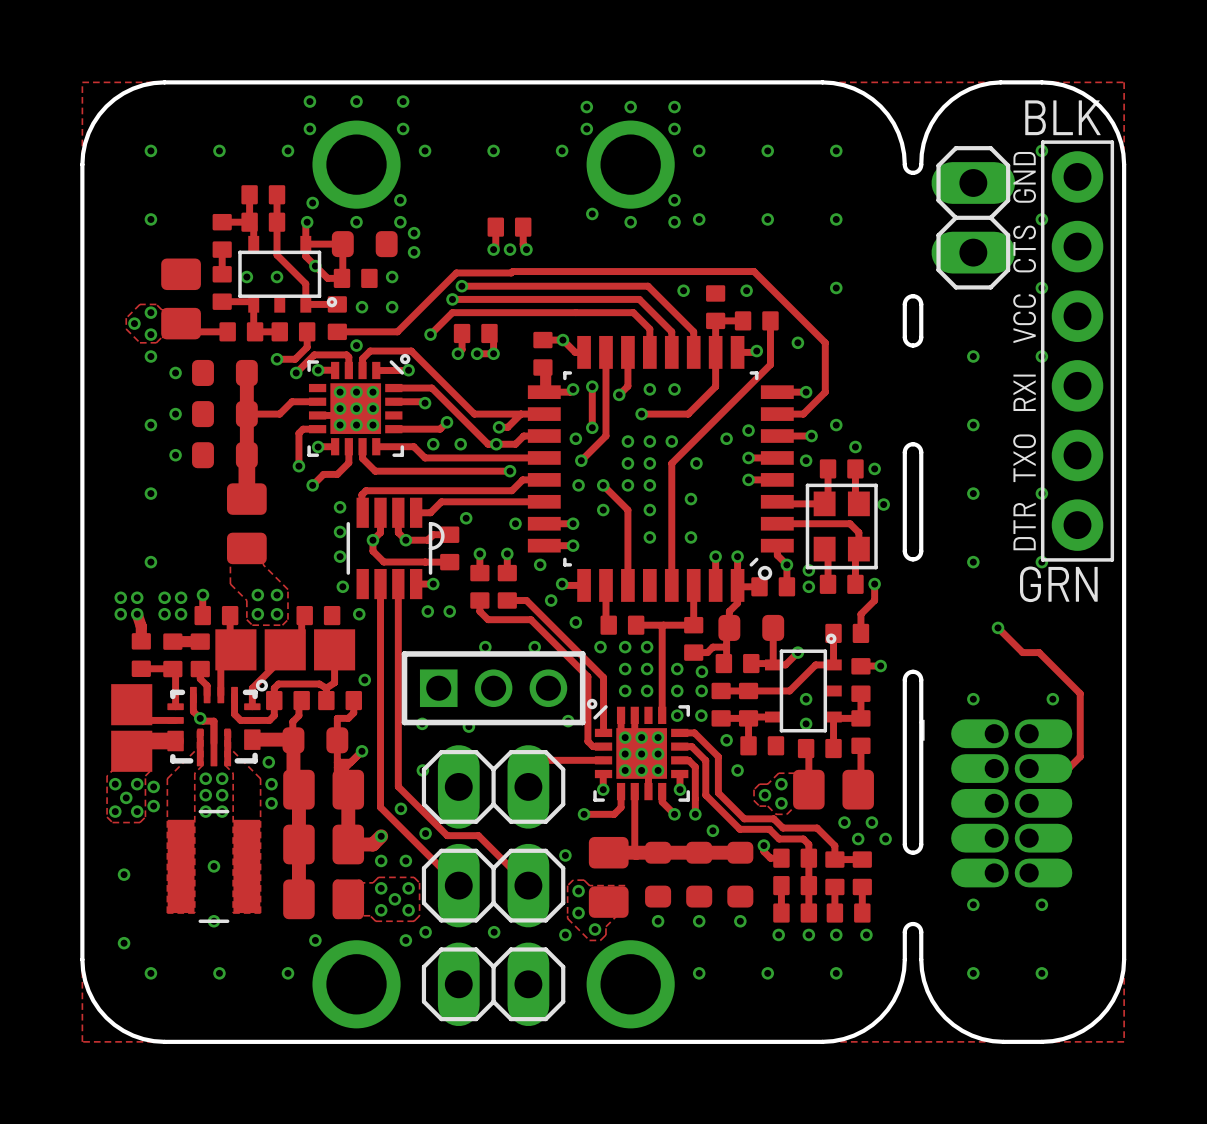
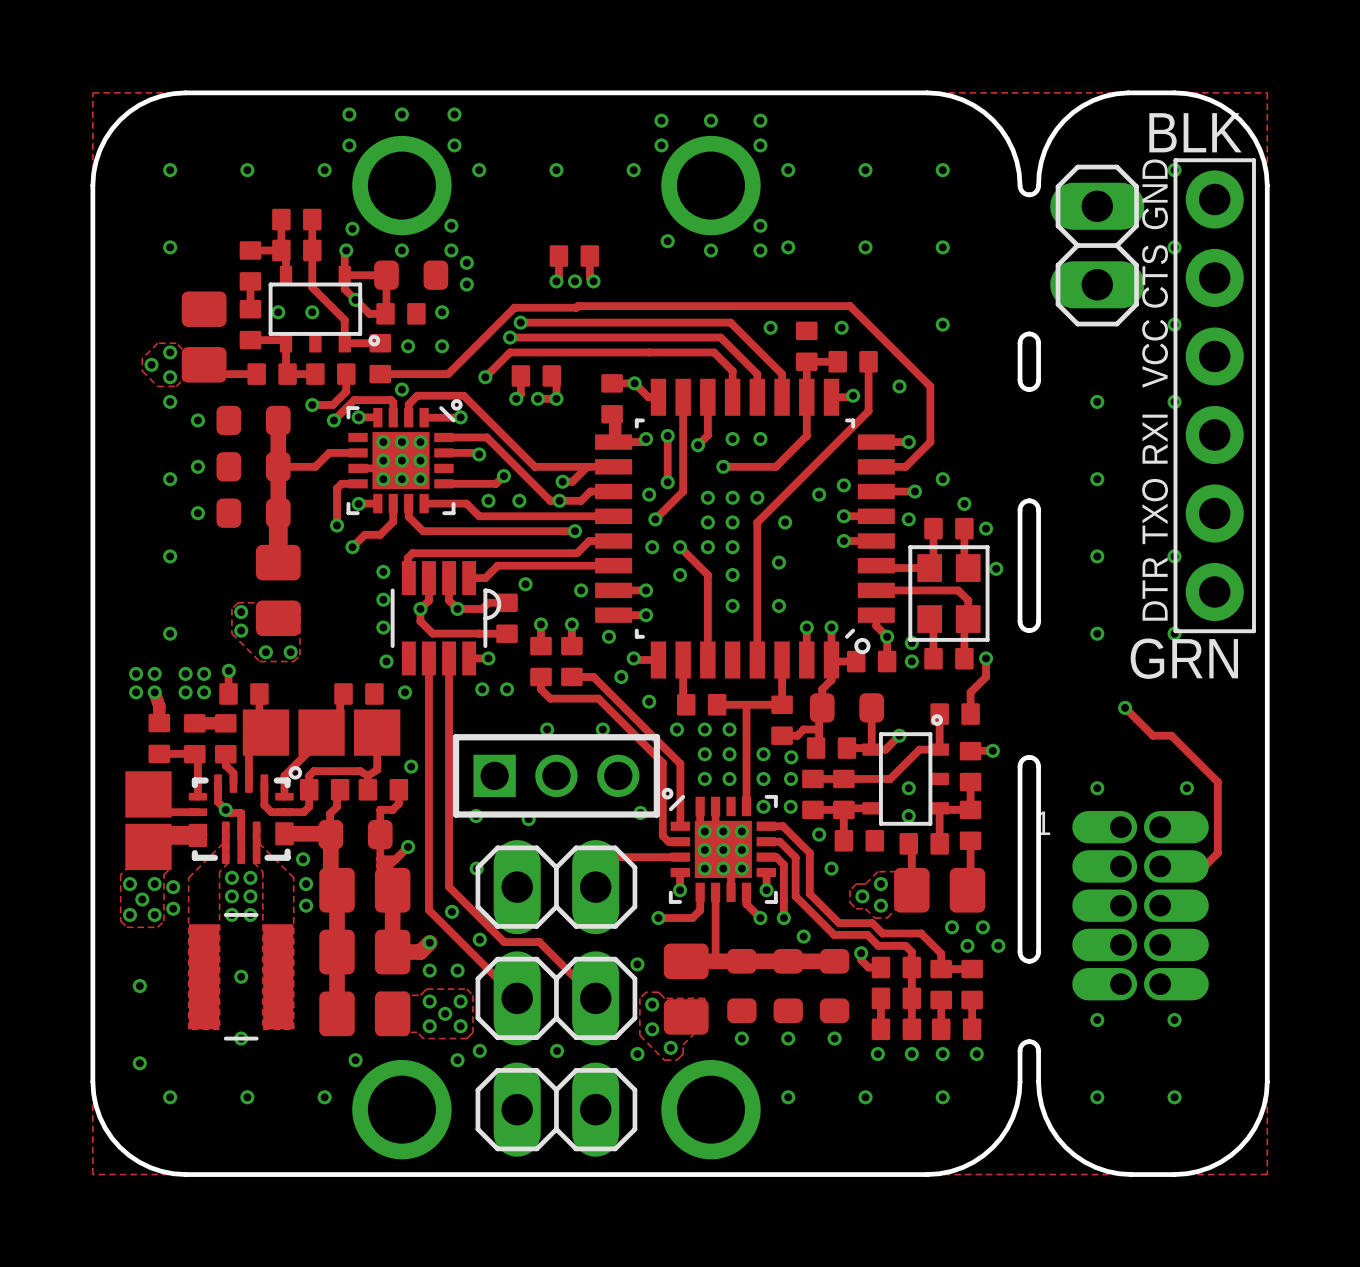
zone outline: (230, 534) (230, 584) (246, 600) (246, 619) (252, 625) (282, 625) (287, 619) (287, 589) (263, 564) (263, 534) -> (259, 602) (238, 602) (231, 608) (231, 633) (259, 661) (293, 661) (299, 655) (299, 605) (296, 602)
via: none -> (241, 612)
via: none -> (241, 630)
via: none -> (265, 652)
via: none -> (290, 652)
via: (257, 595) -> none
via: (277, 595) -> none
via: (257, 614) -> none
via: (277, 614) -> none

